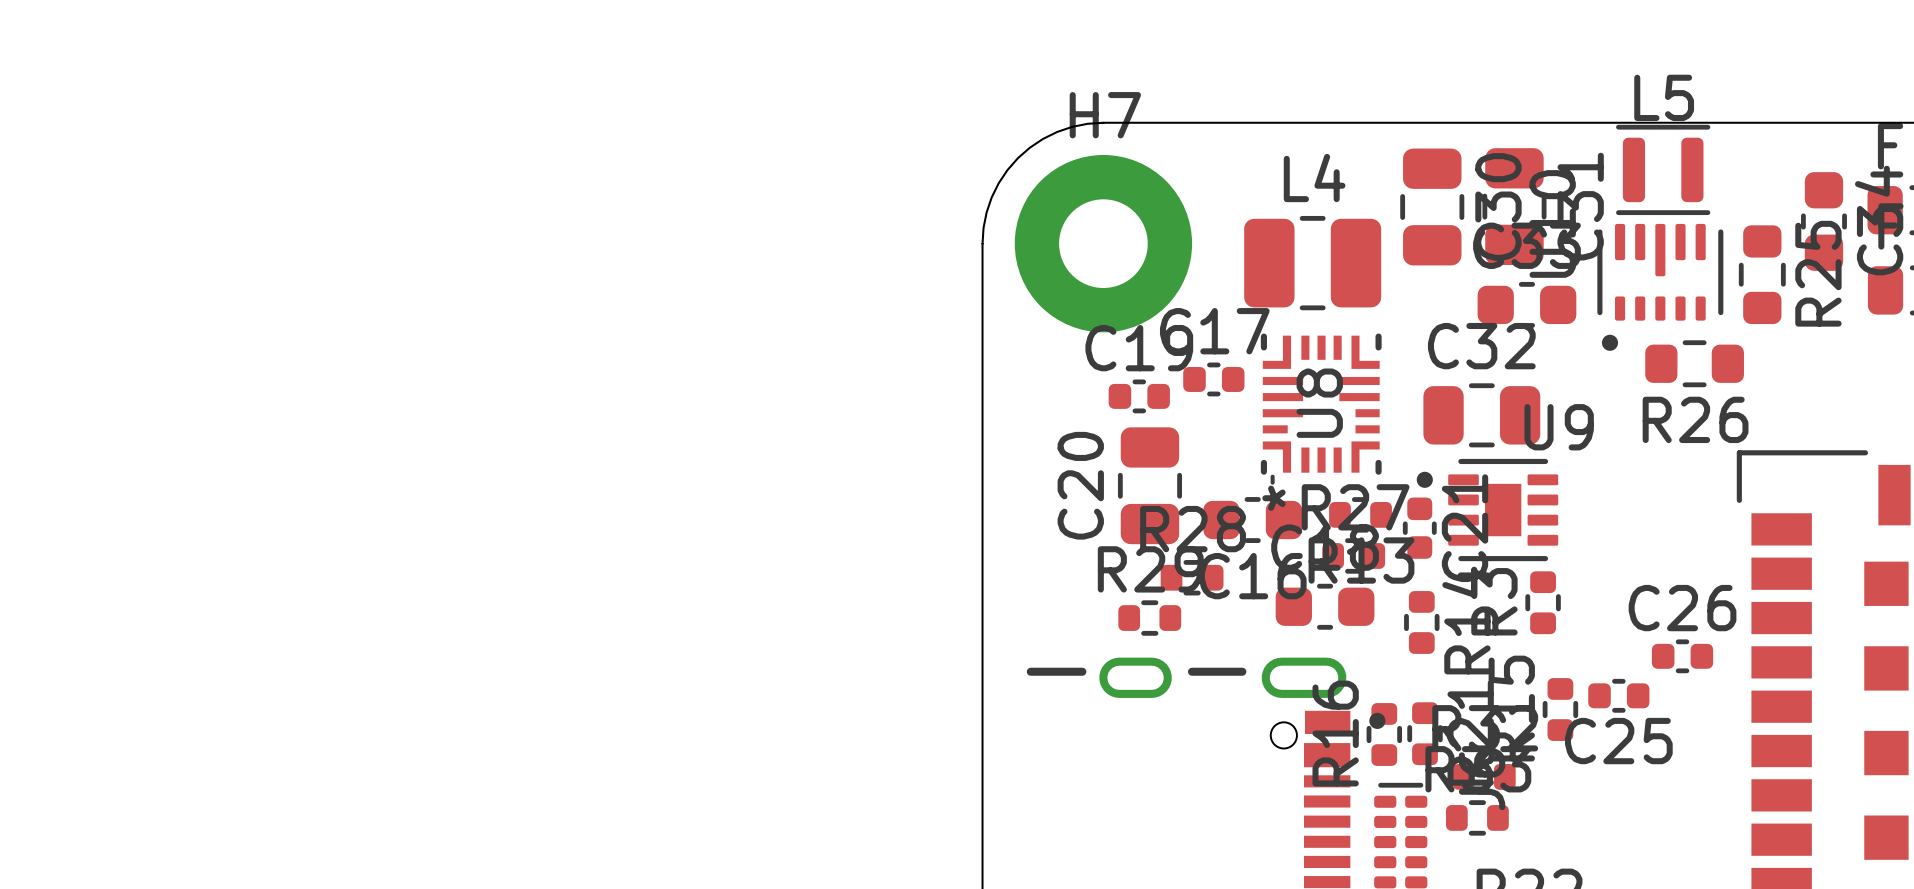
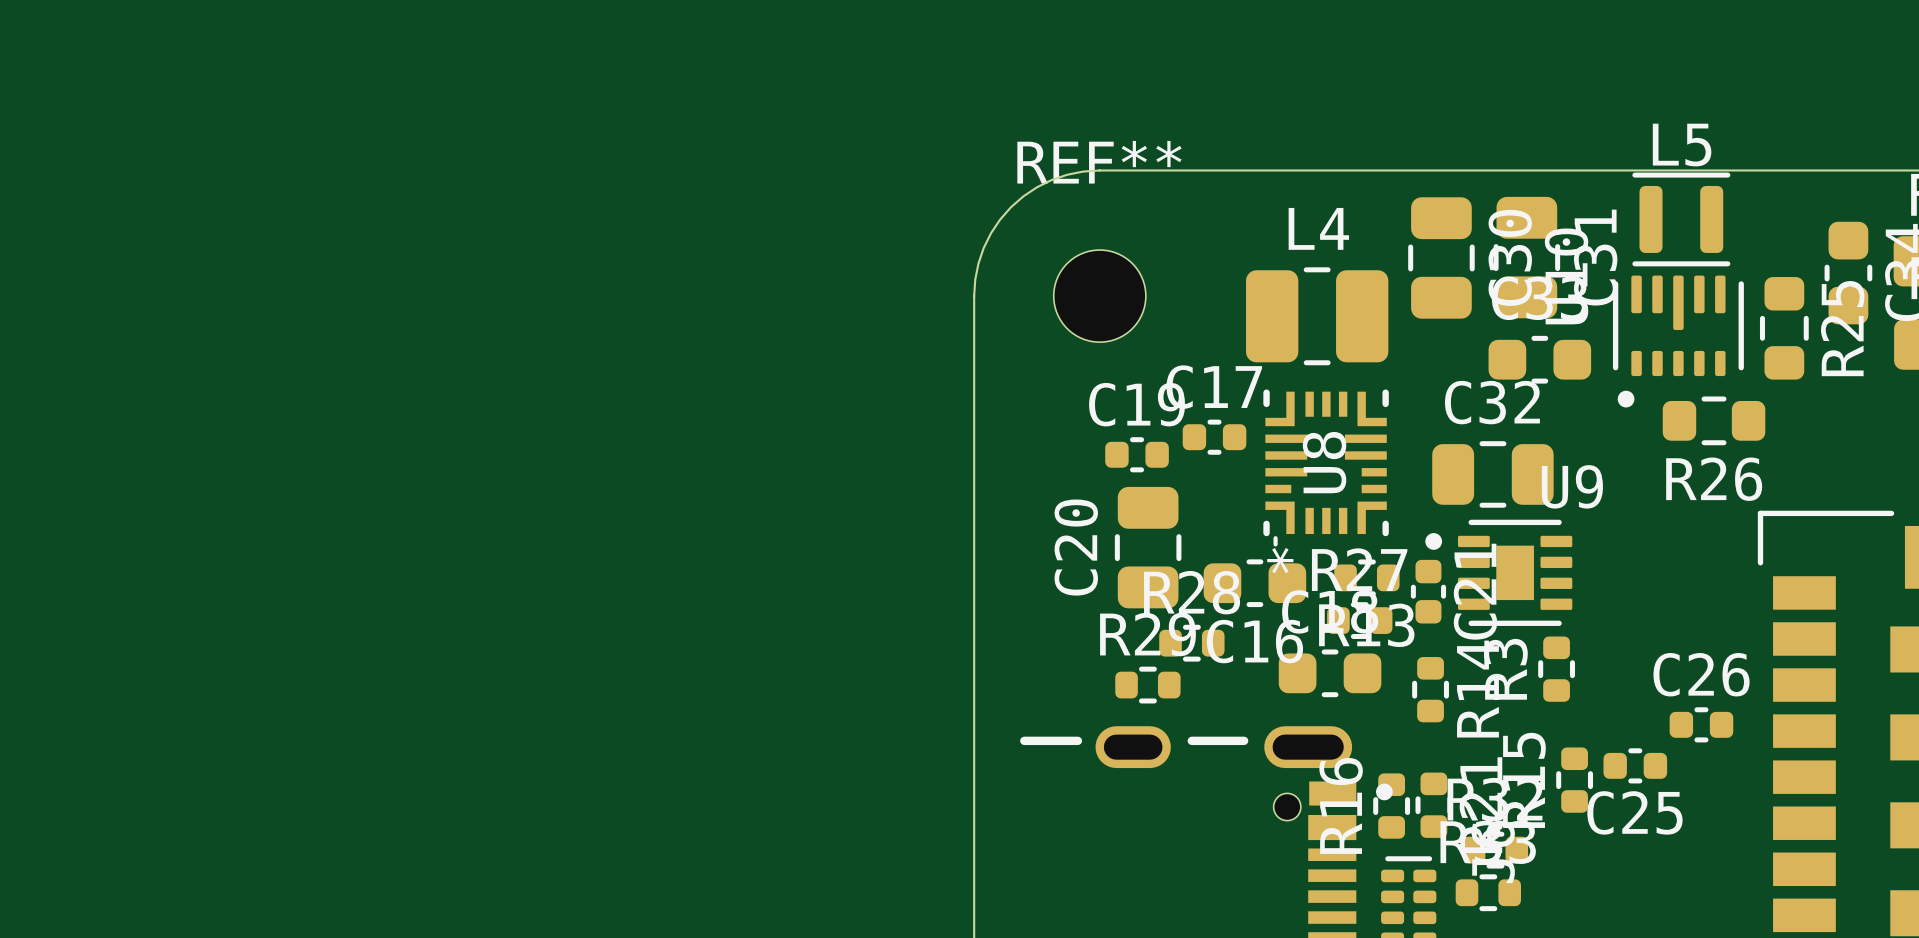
H7: (1103, 243) -> none
REF**: none -> (1099, 296)

